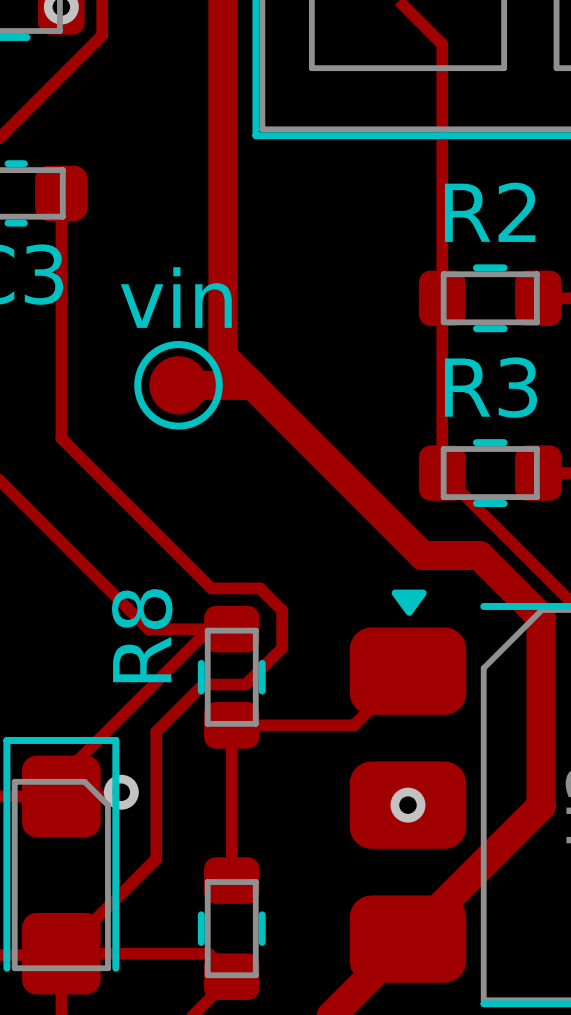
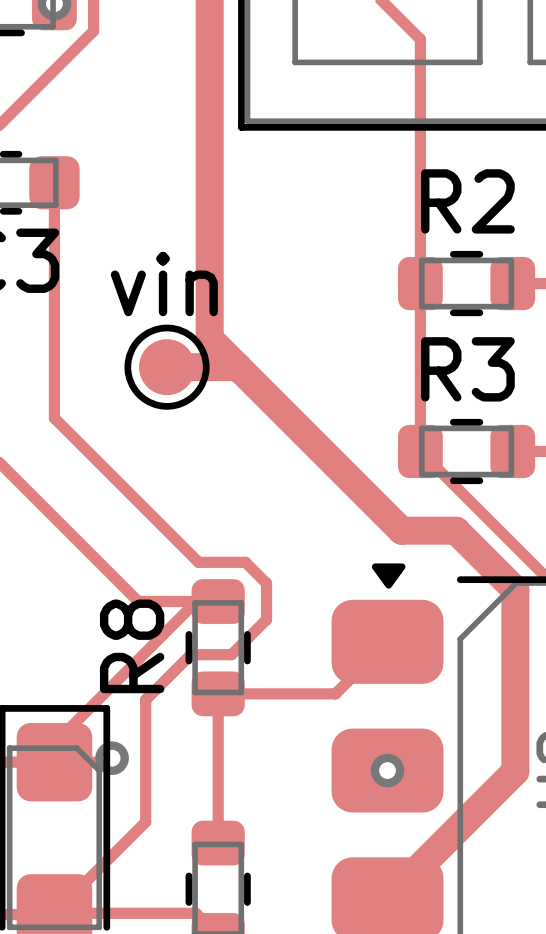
R8 name position: R8 (142, 635) -> R8 (132, 646)

